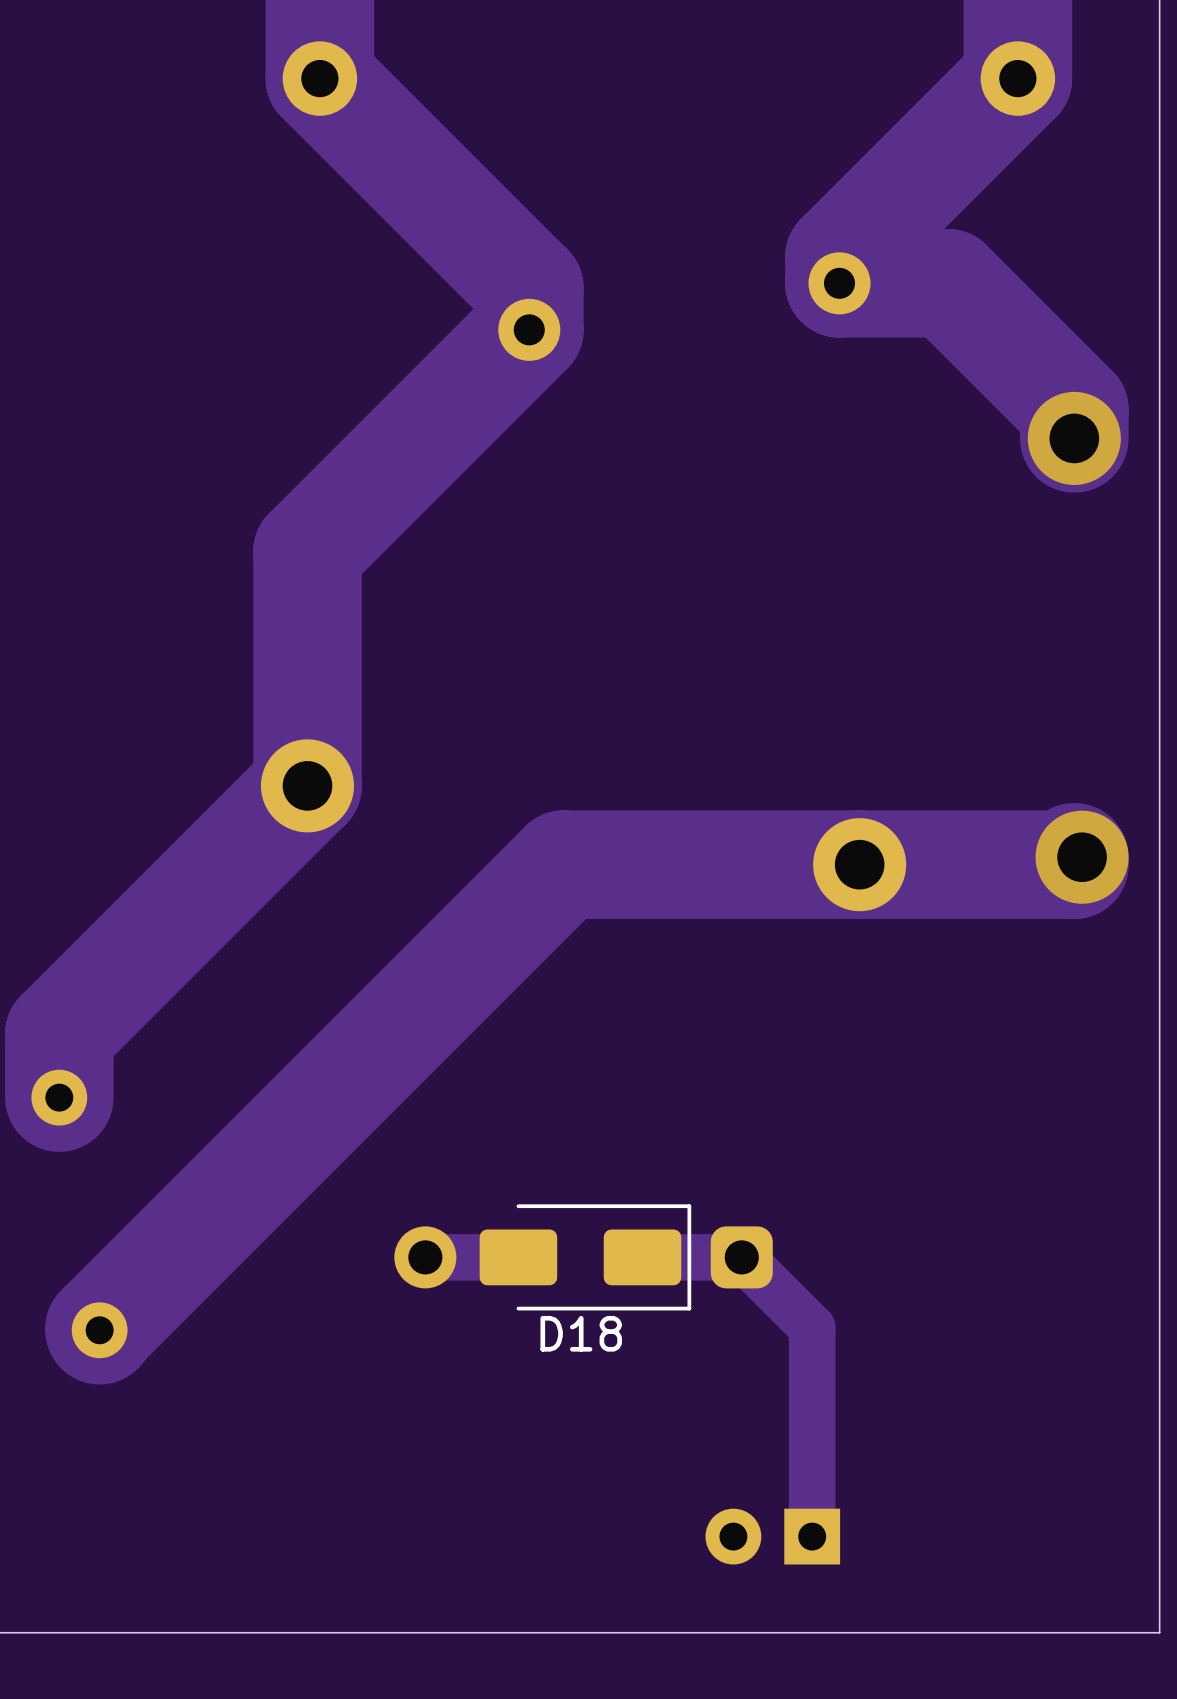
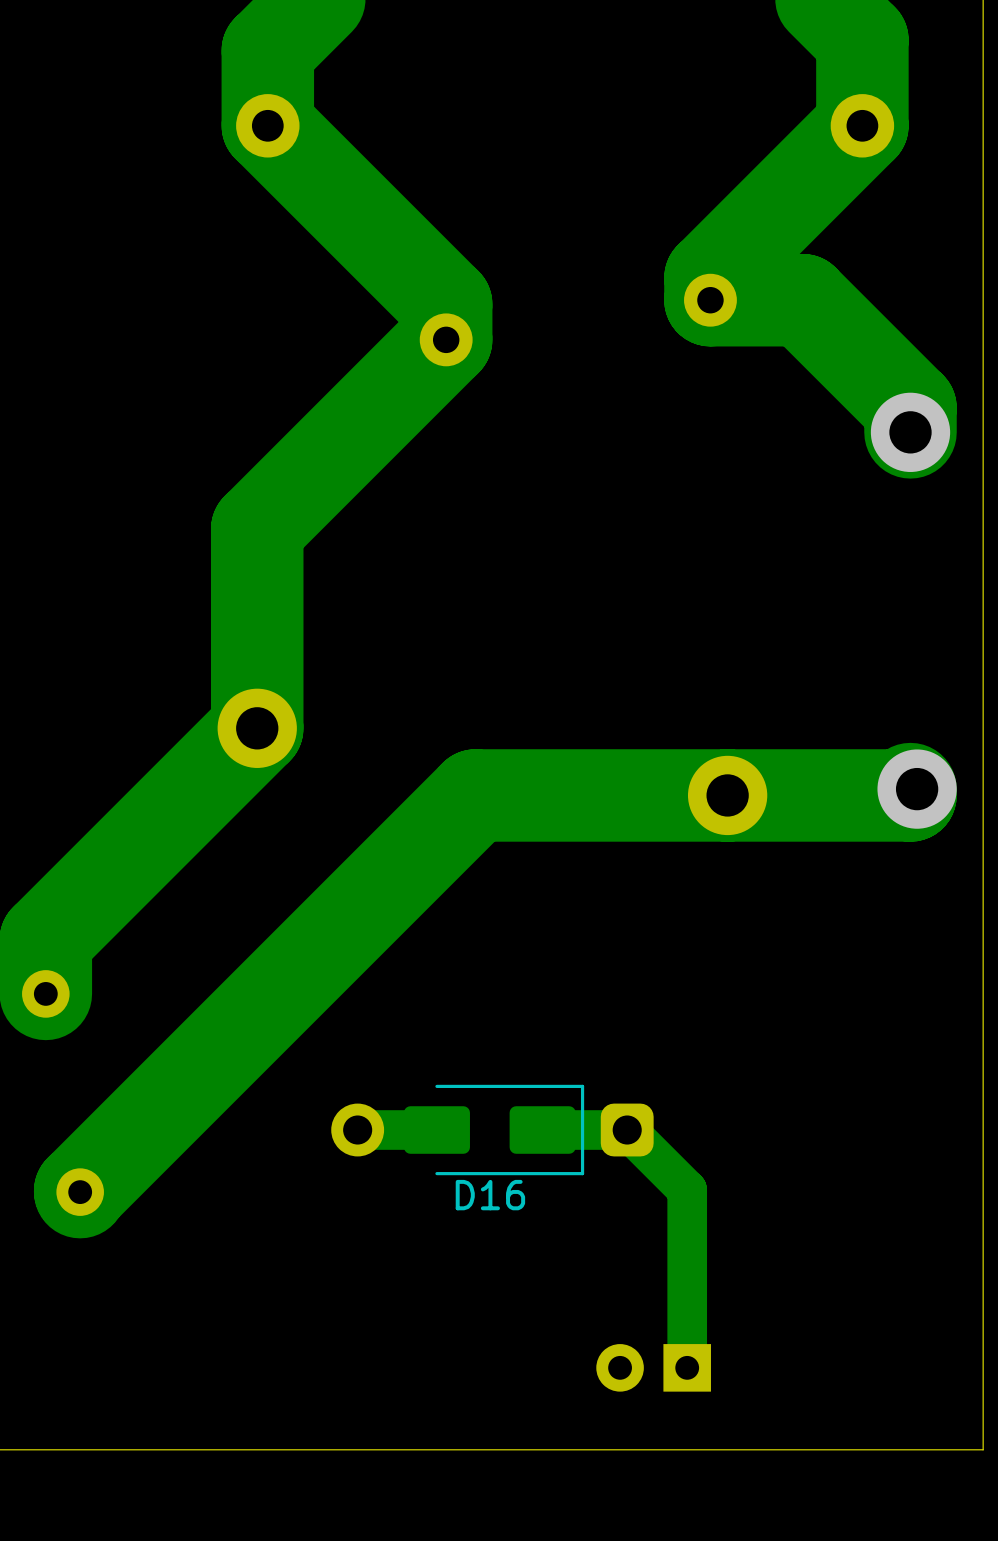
D18 name: D18 (581, 1333) -> D16 (490, 1195)

